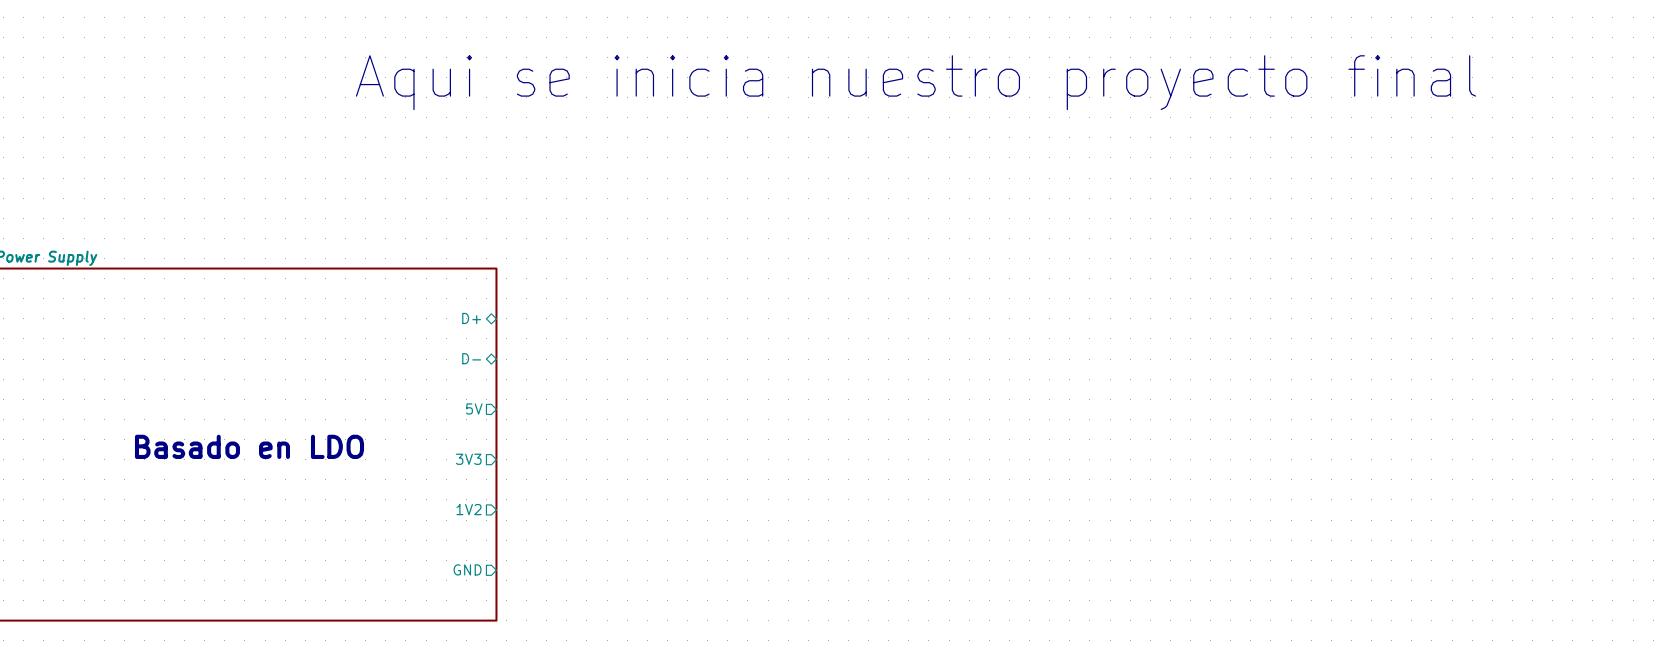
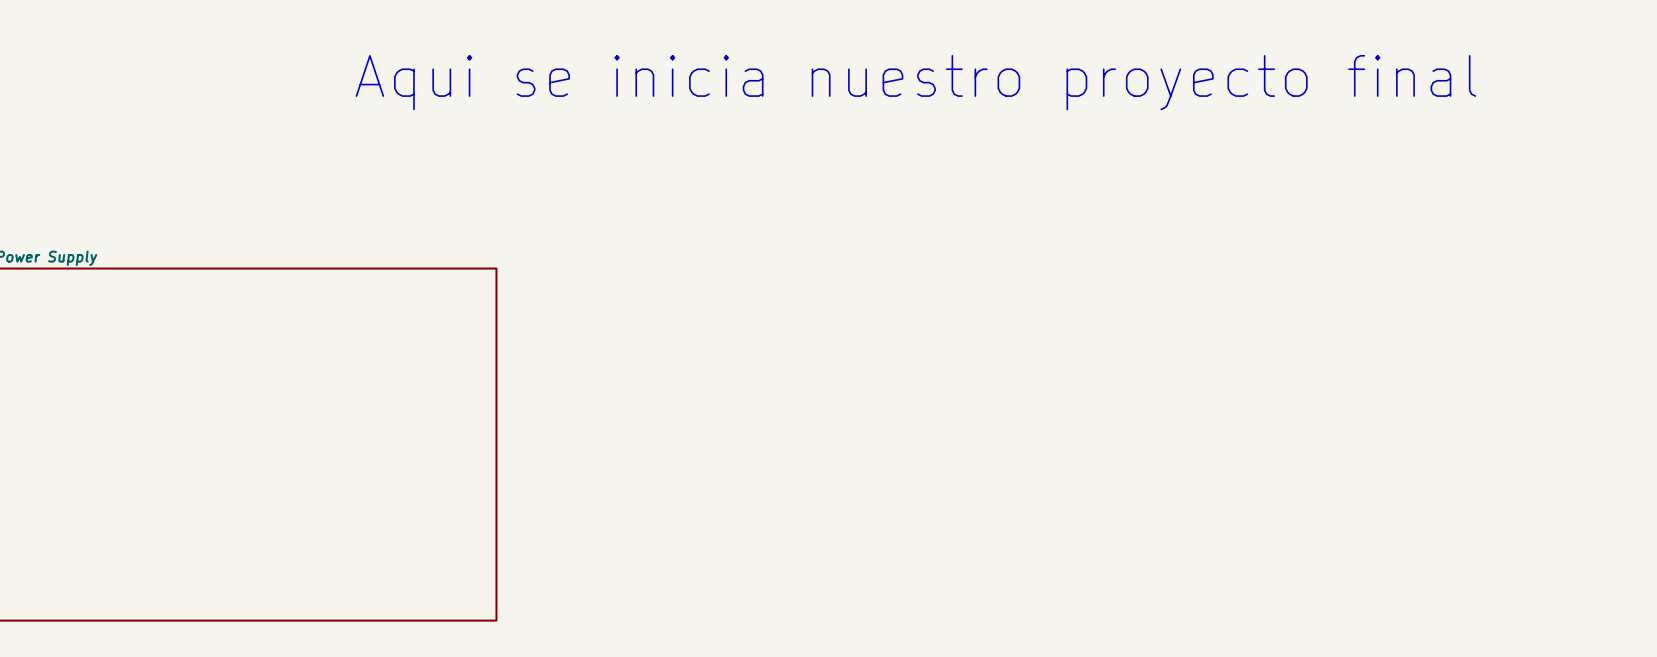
sheet pin: D+ (471, 318) -> none
sheet pin: D- (471, 358) -> none
sheet pin: 5V (474, 408) -> none
text: Basado en LDO (249, 446) -> none
sheet pin: 3V3 (468, 459) -> none
sheet pin: 1V2 (469, 509) -> none
sheet pin: GND (467, 569) -> none

